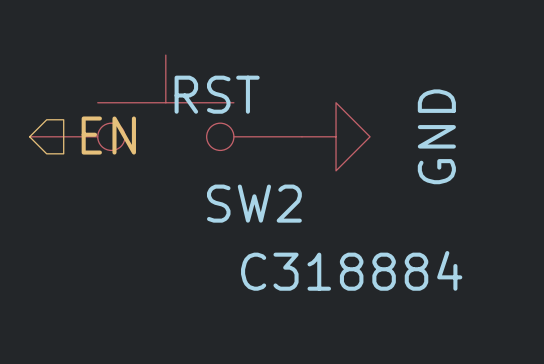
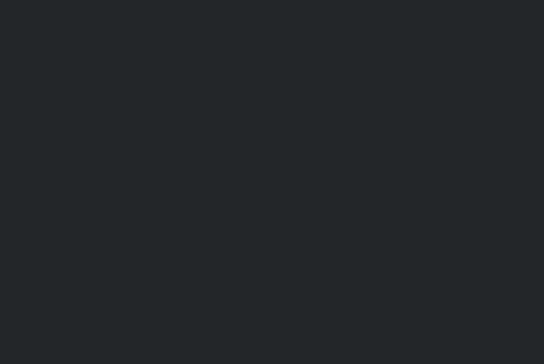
SW2: RST (165, 102) -> none
hierarchical label: EN (108, 135) -> none
power symbol: GND (336, 136) -> none

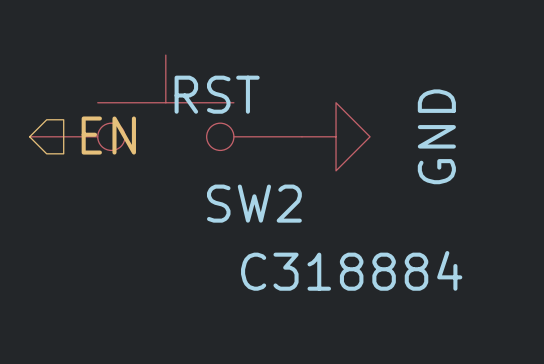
SW2: none -> RST (165, 102)
hierarchical label: none -> EN (108, 135)
power symbol: none -> GND (336, 136)

